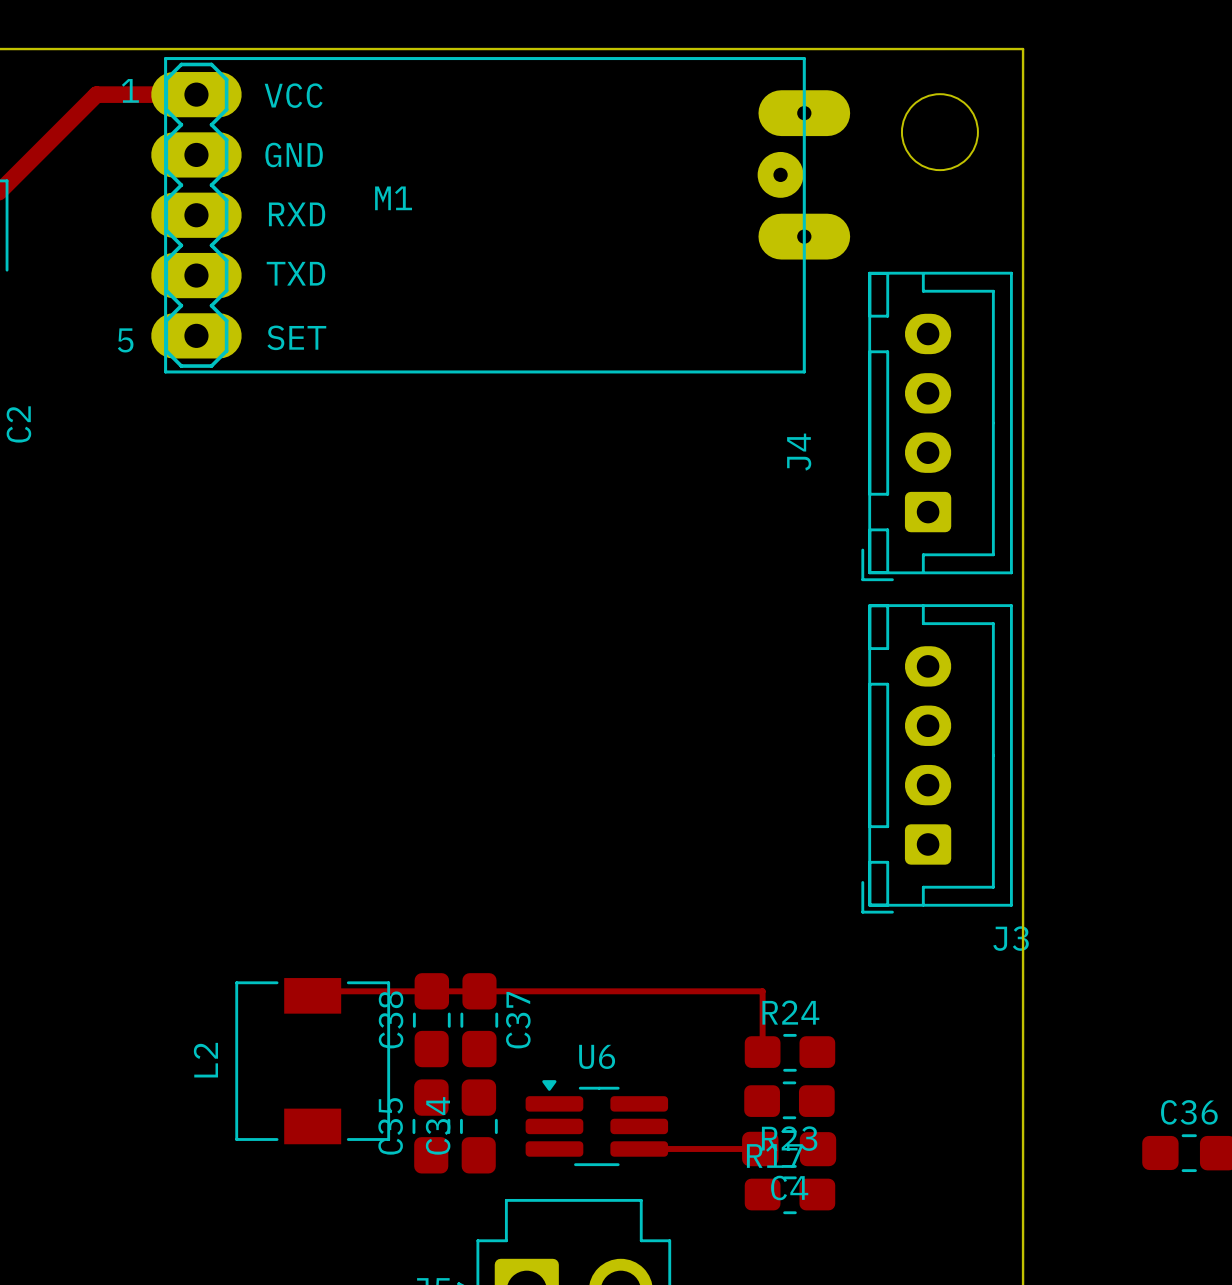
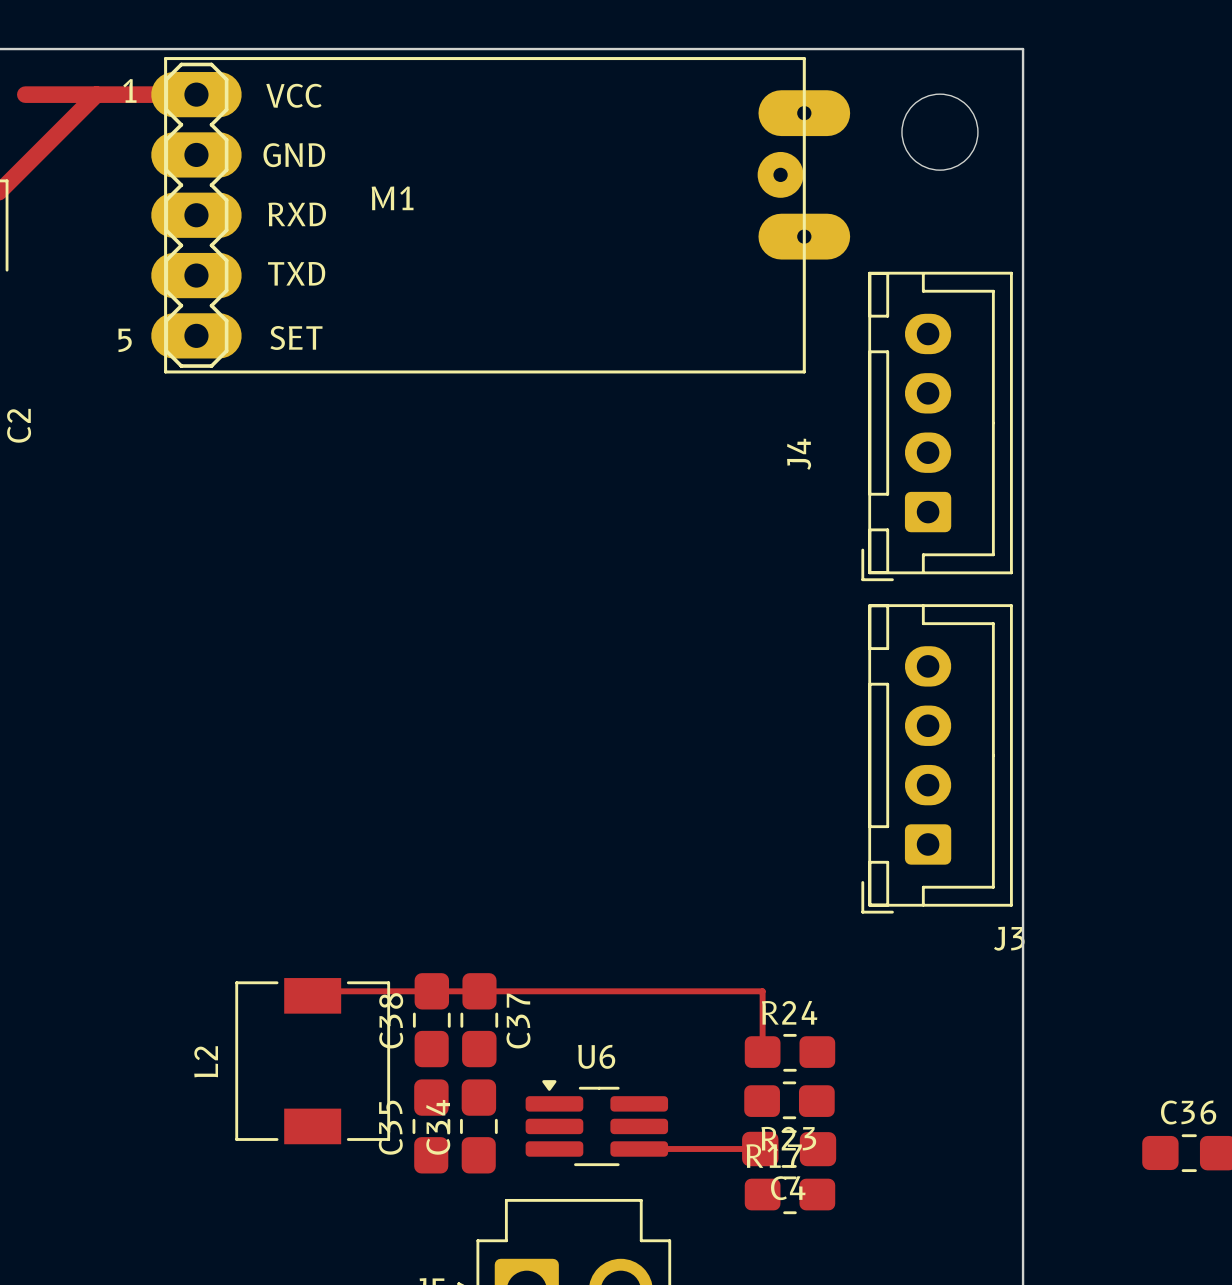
track: none -> (25, 94) (96, 94)

